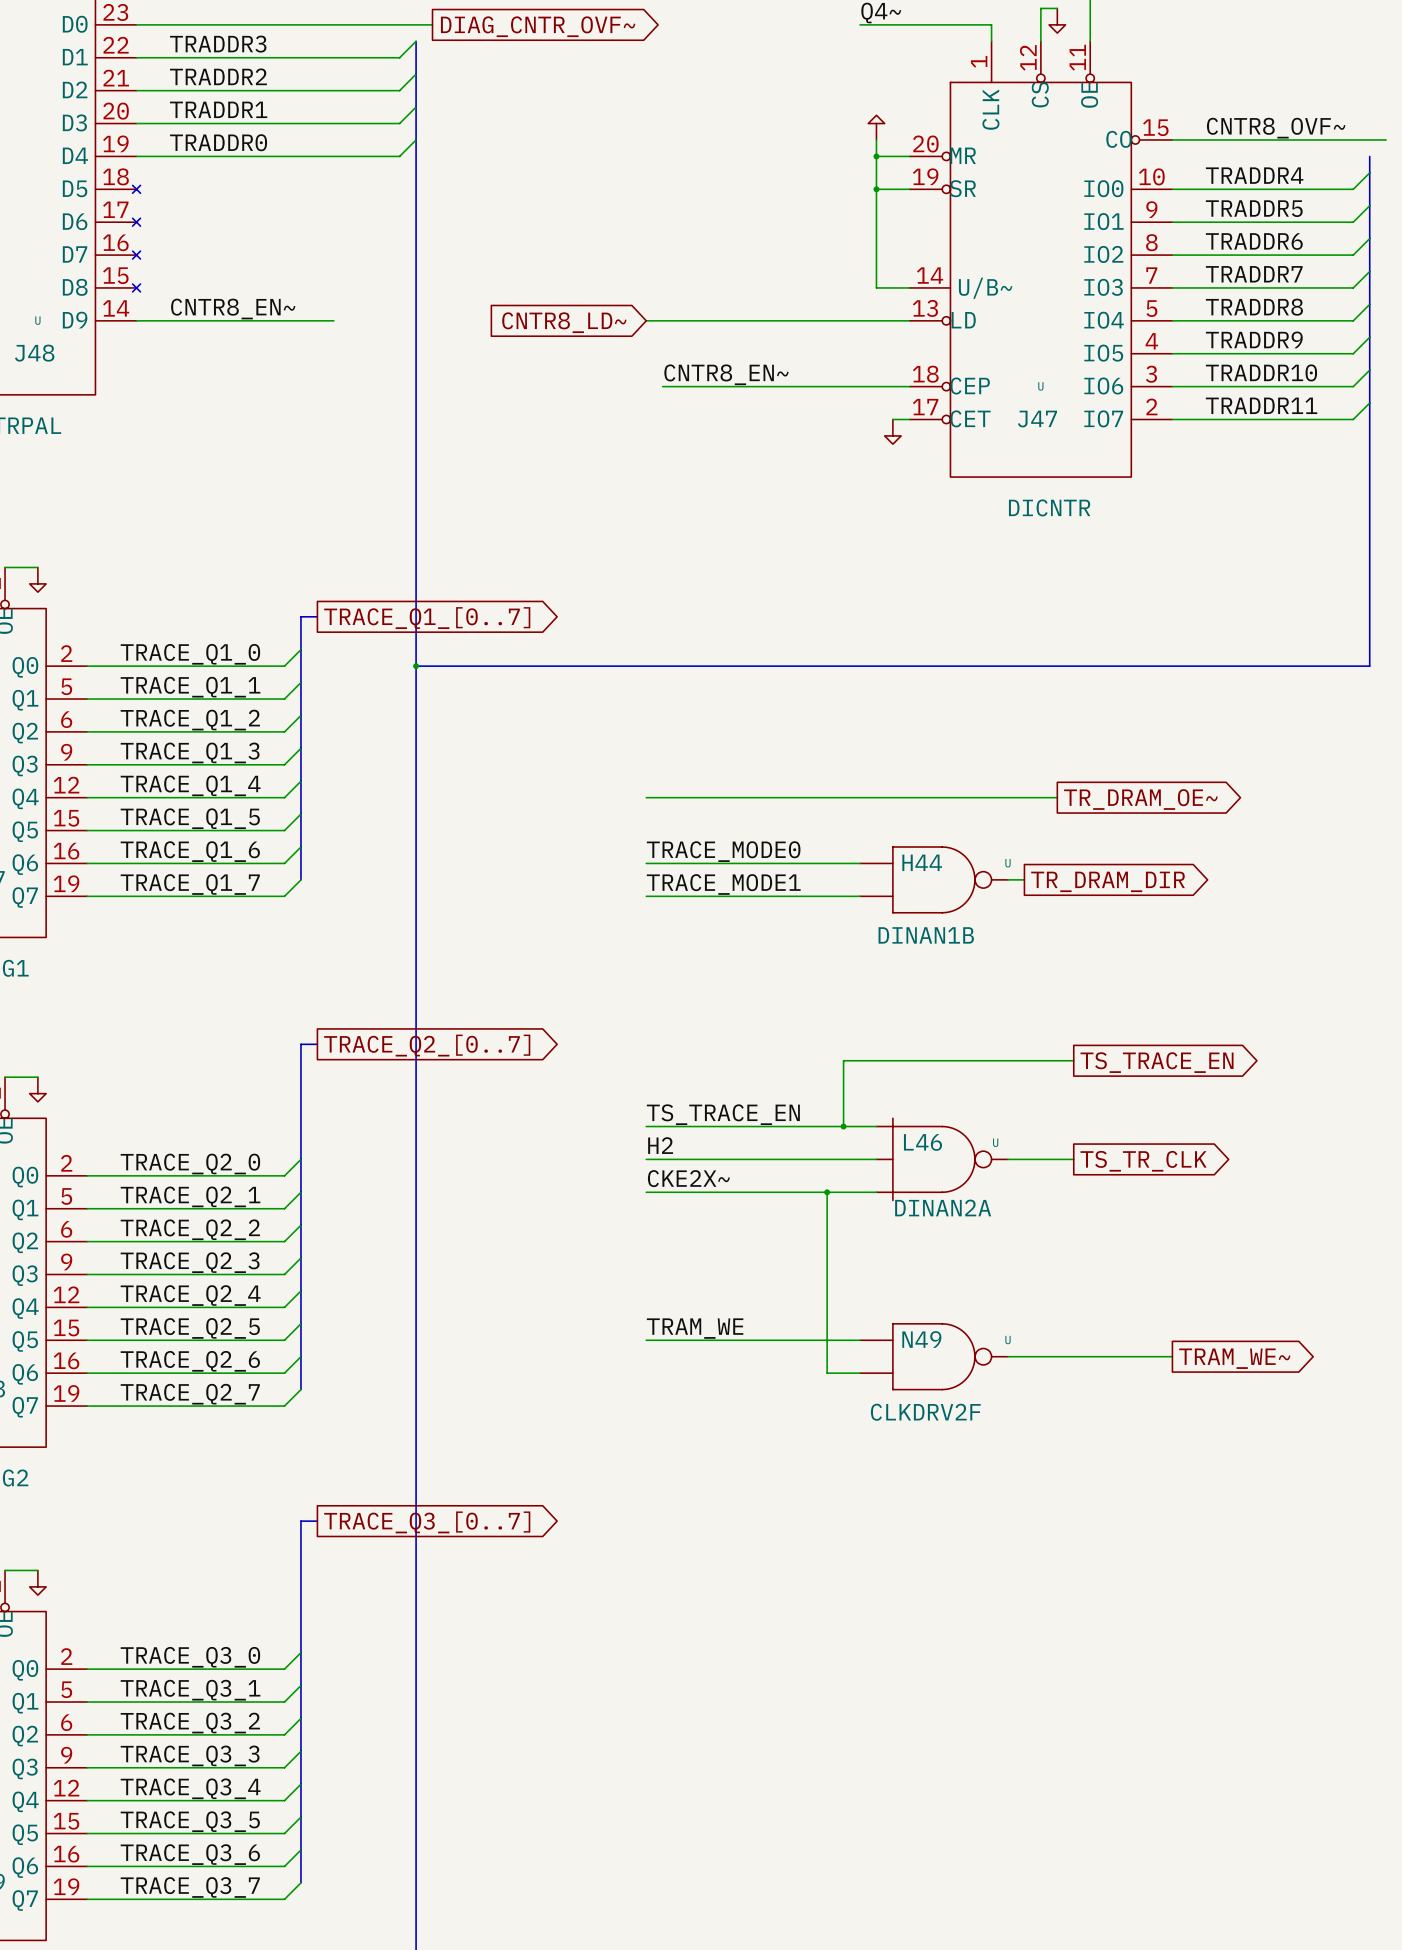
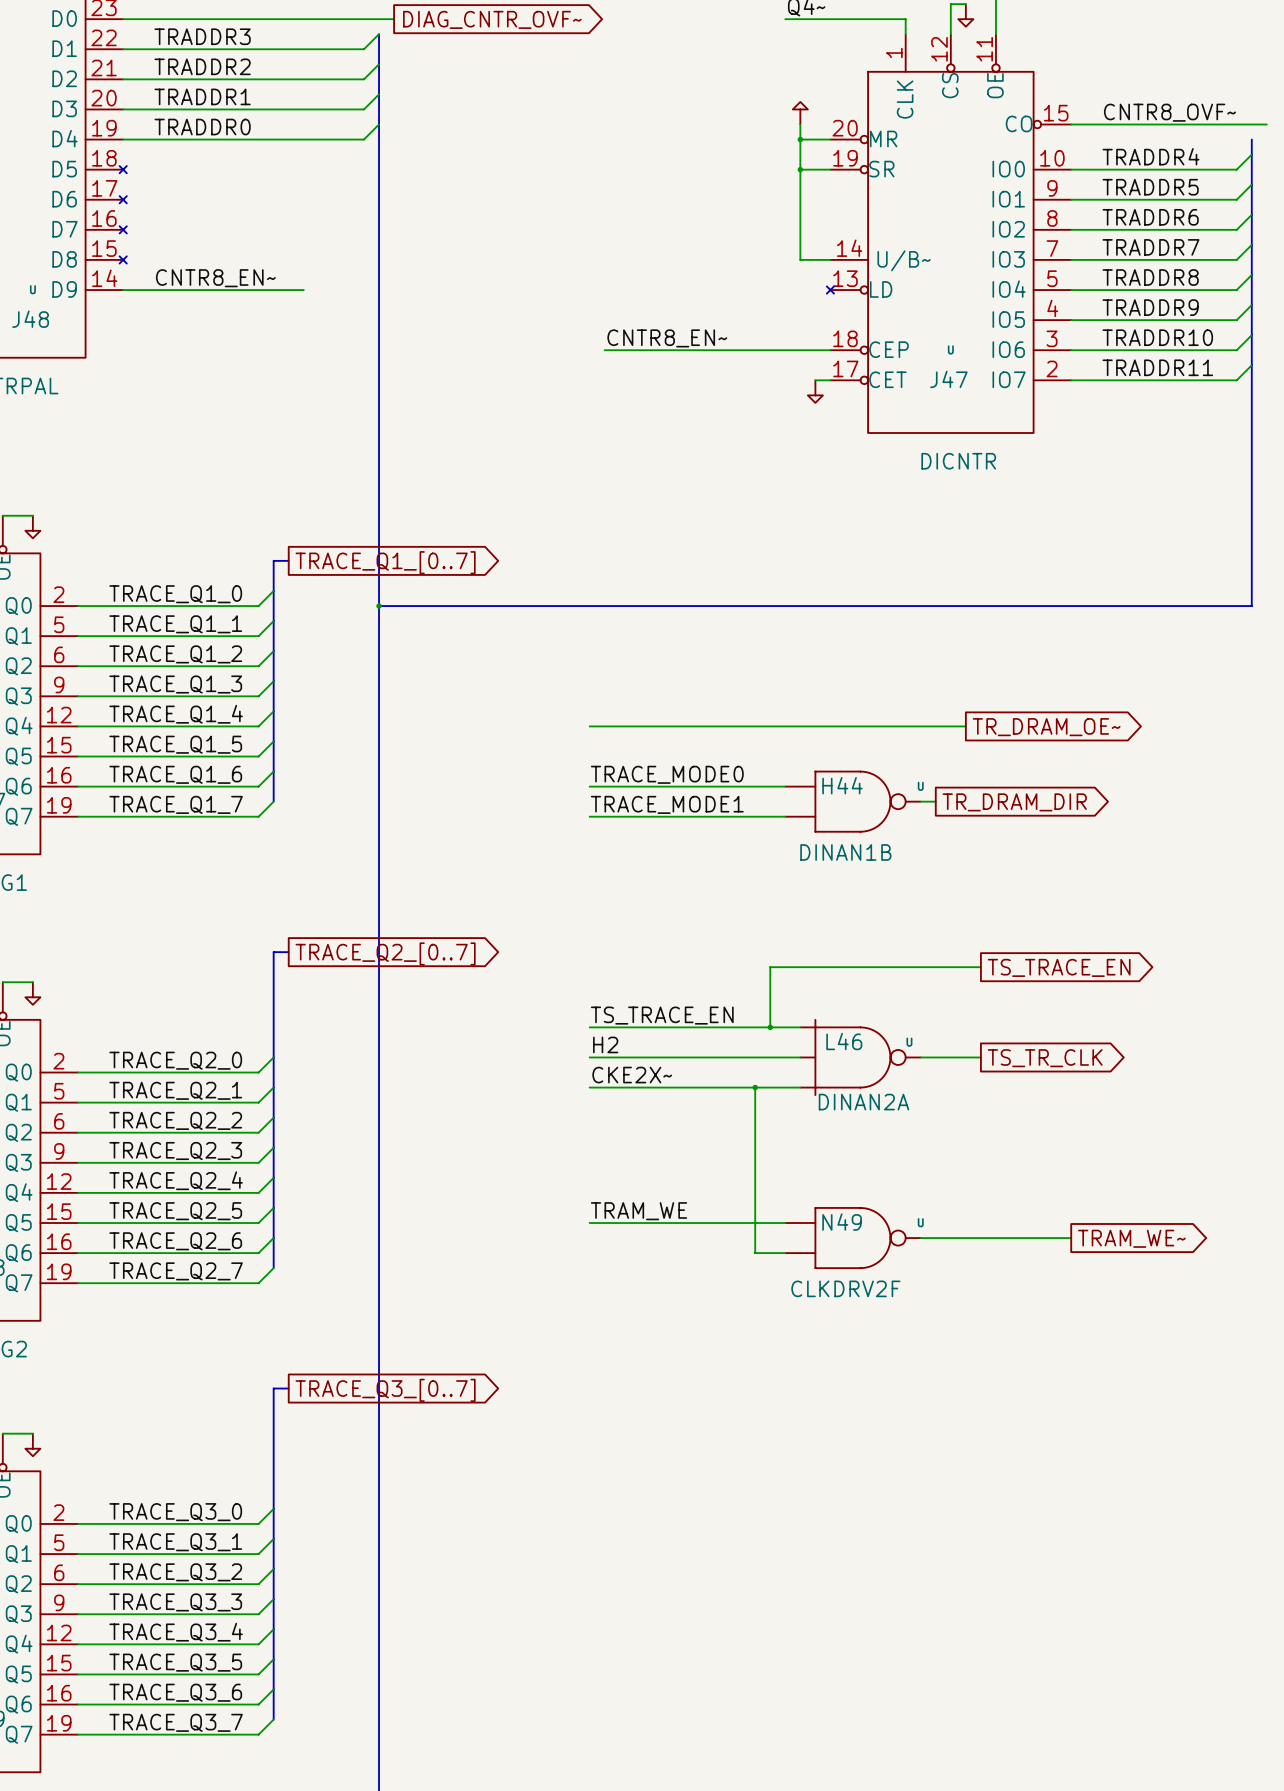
wire: (646, 320) (909, 320) -> none
no-connect mark: none -> (830, 290)
global label: CNTR8_LD~ (564, 322) -> none

